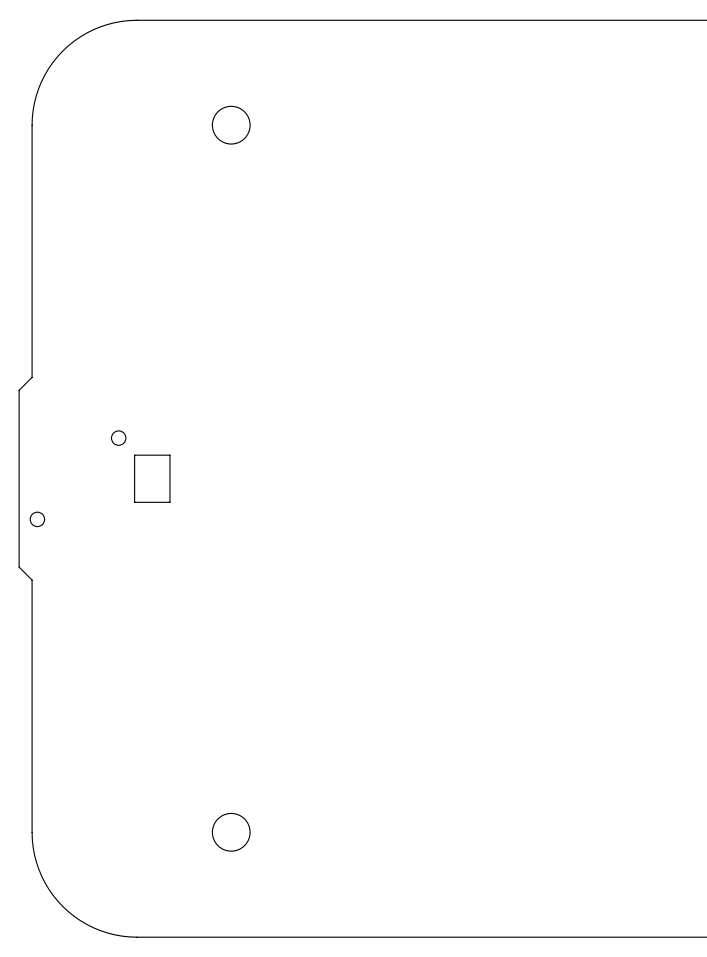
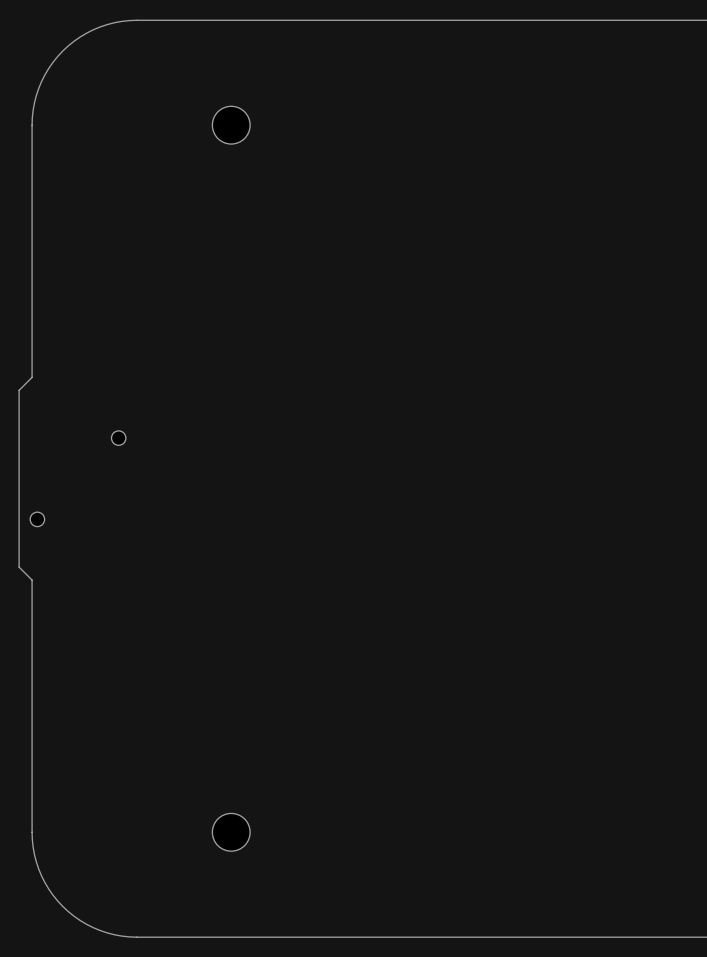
board edge: (169, 455) (134, 455) (134, 502) (169, 502) (169, 455) -> none

